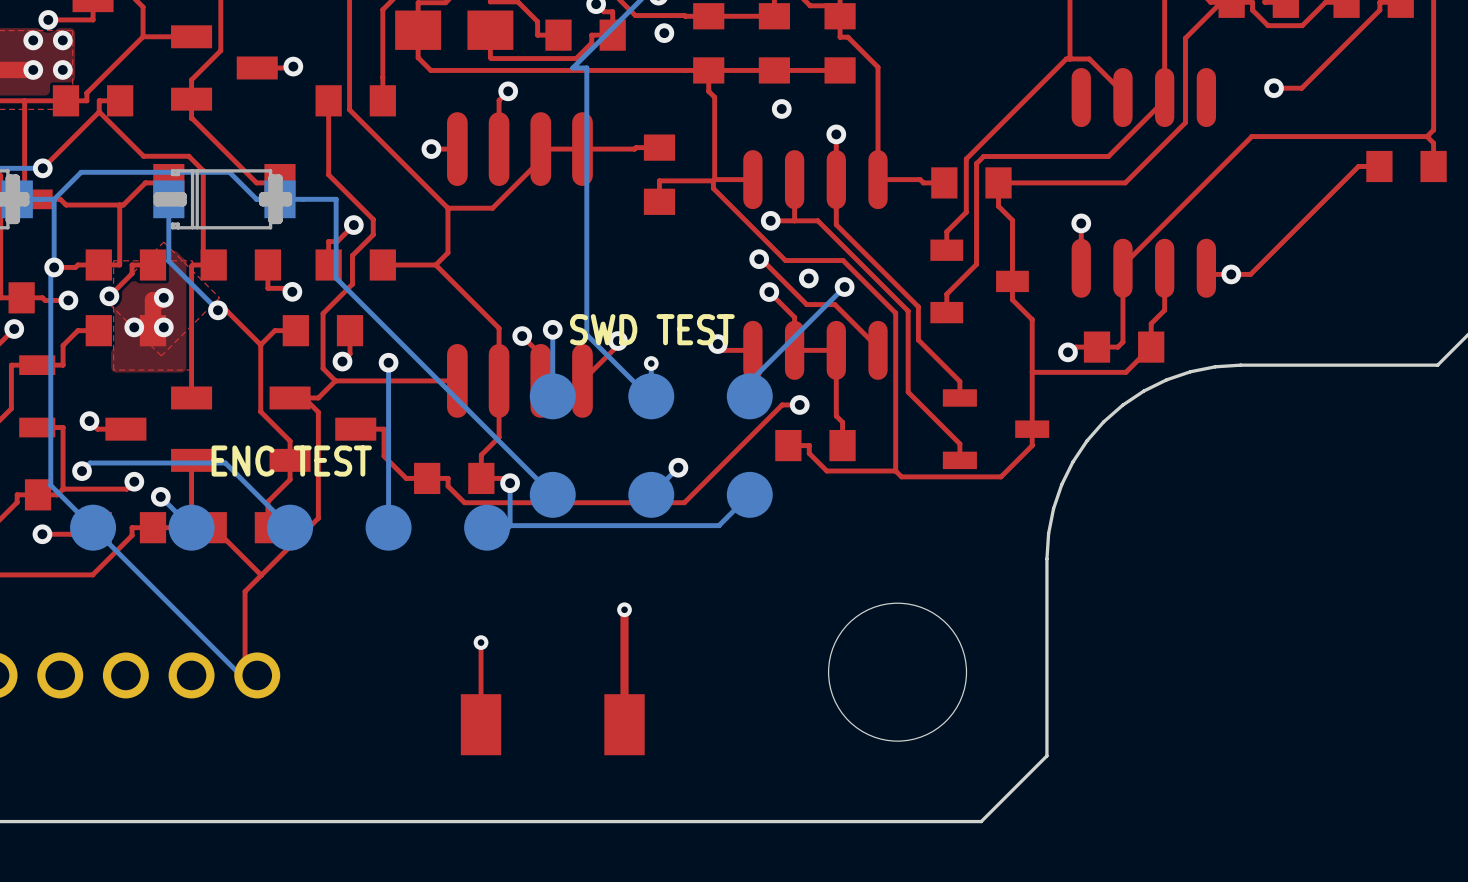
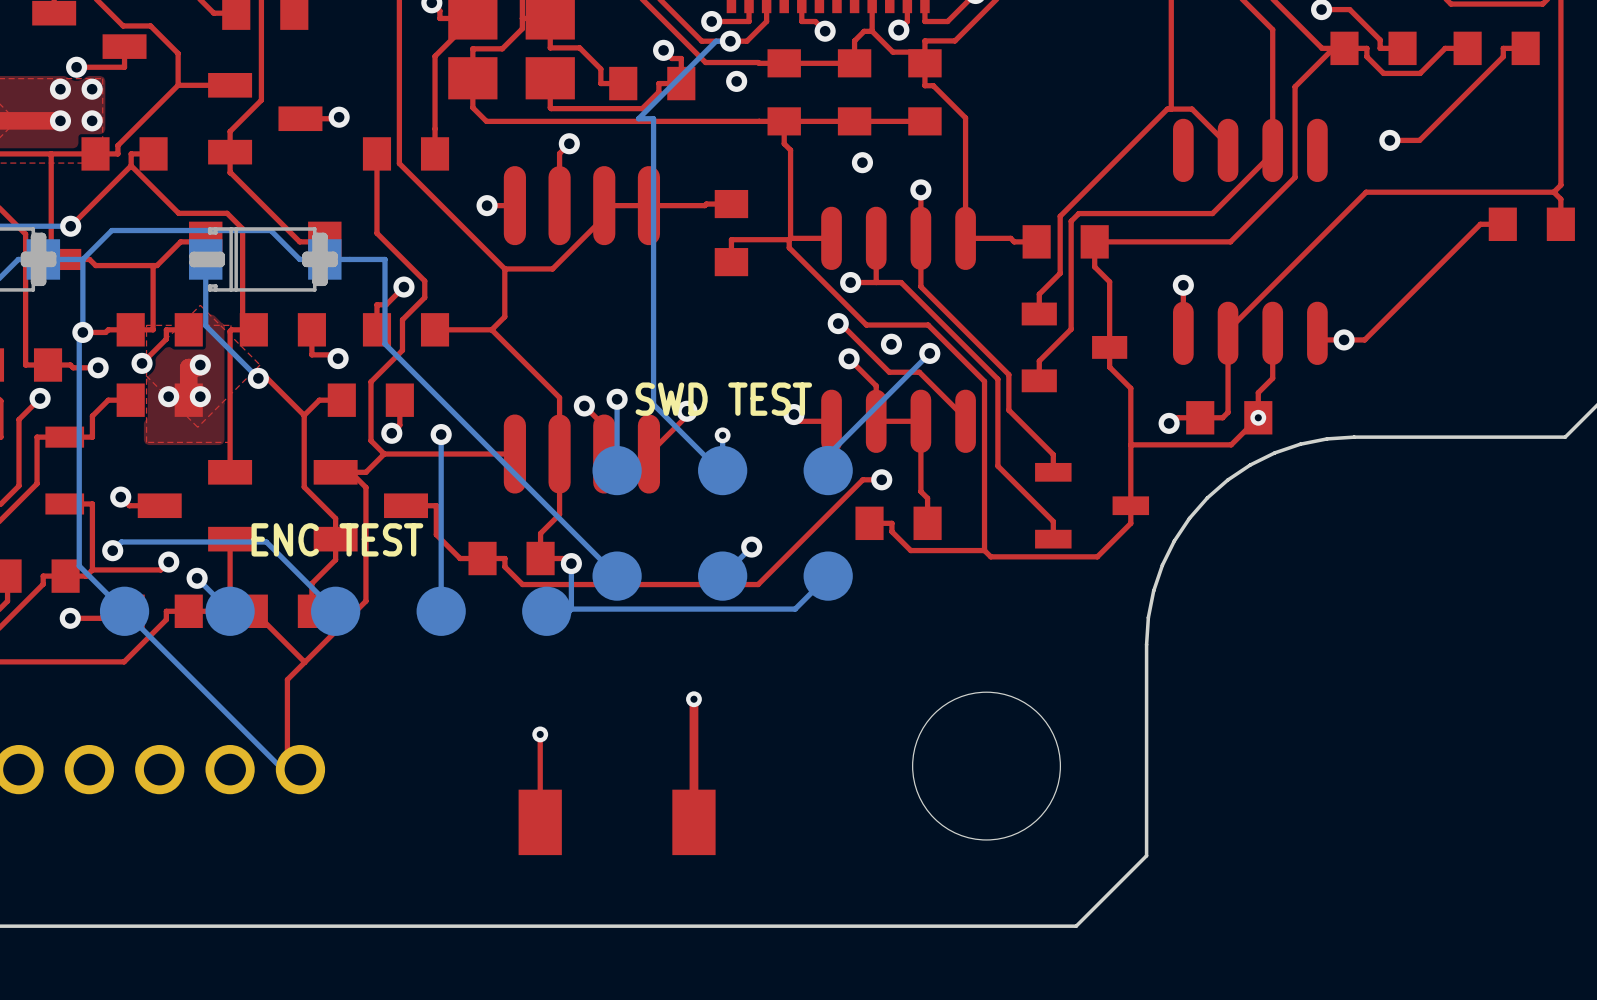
via: none -> (1258, 417)

